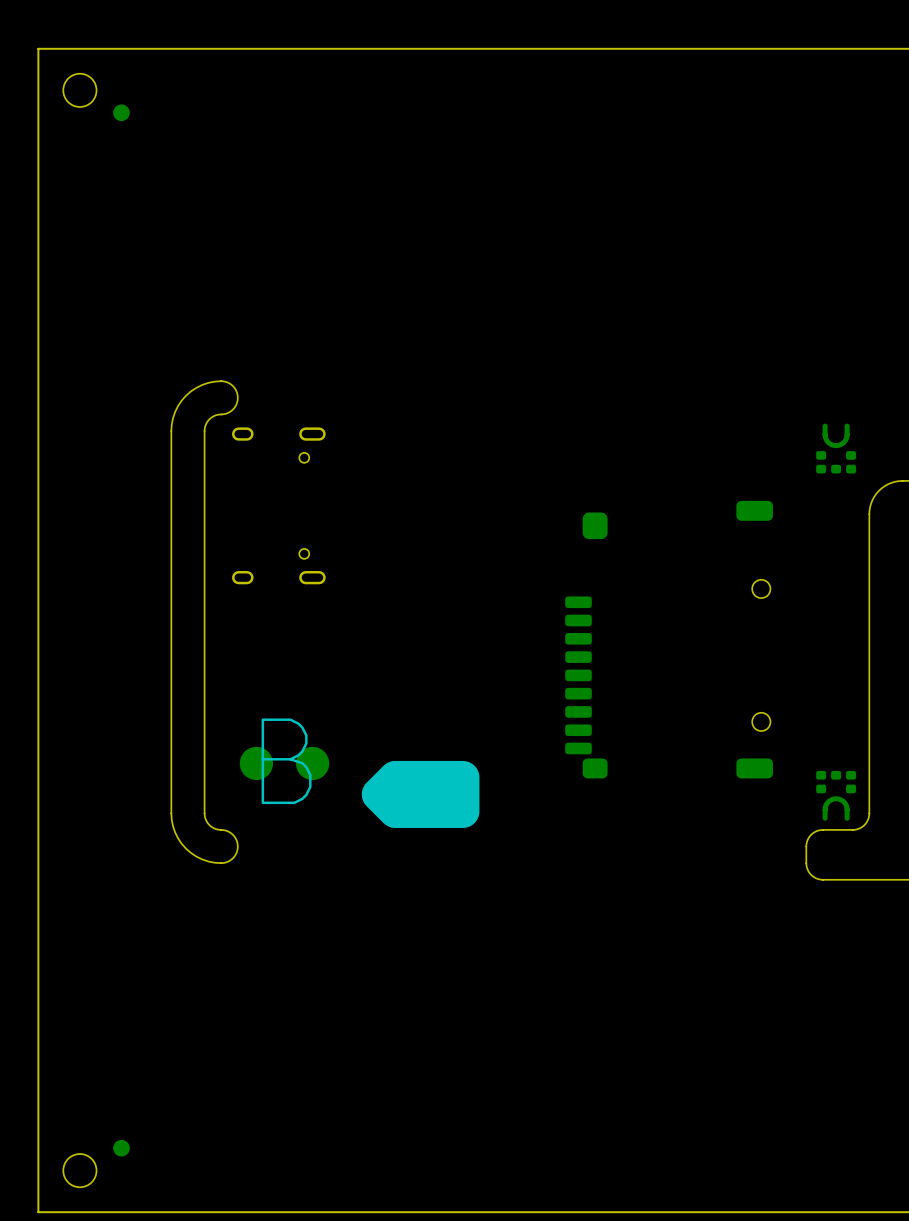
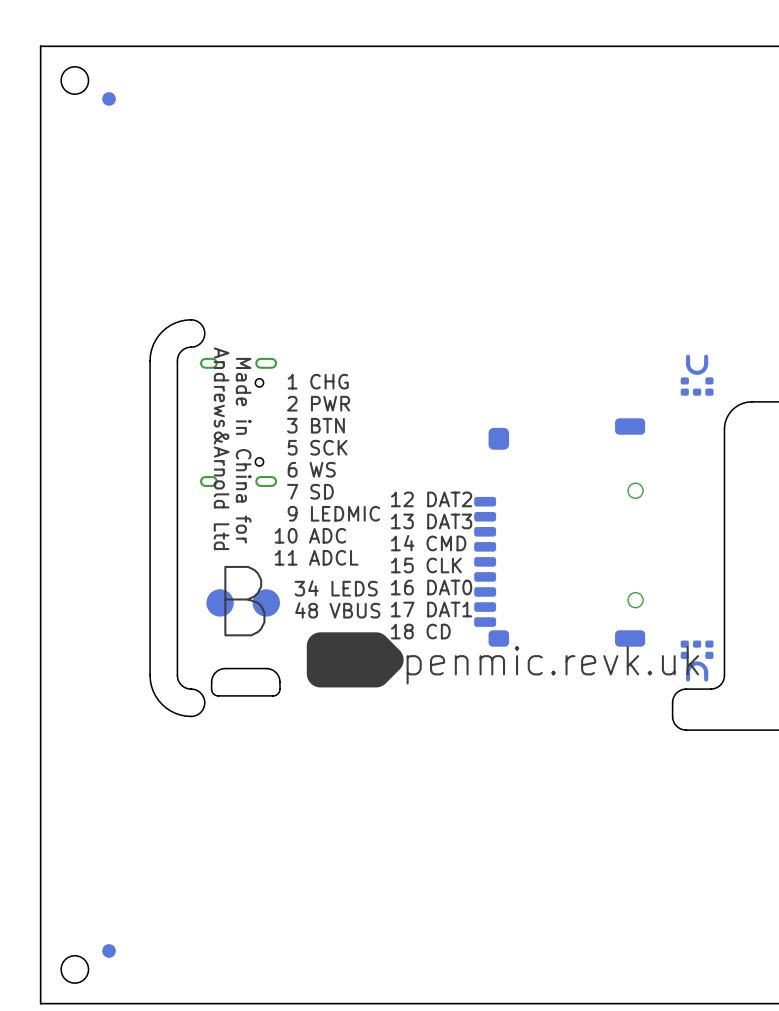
text: none -> 1 (292, 381)
text: none -> CHG (329, 381)
text: none -> 2 (292, 403)
text: none -> PWR (330, 403)
text: none -> 3 (292, 425)
text: none -> BTN (327, 425)
text: none -> 5 (292, 447)
text: none -> SCK (328, 447)
text: none -> Andrews&Arnold Ltd (221, 448)
text: none -> Made in China for (243, 450)
text: none -> 6 (292, 469)
text: none -> WS (322, 469)
text: none -> 7 (292, 491)
text: none -> SD (322, 491)
text: none -> 12 (402, 499)
text: none -> DAT2 (449, 499)
text: none -> 9 (292, 513)
text: none -> LEDMIC (345, 513)
text: none -> 13 (402, 521)
text: none -> DAT3 (449, 521)
text: none -> 10 (286, 535)
text: none -> ADC (327, 535)
text: none -> 14 (402, 543)
text: none -> CMD (446, 543)
text: none -> 11 (286, 557)
text: none -> ADCL (333, 557)
text: none -> 15 (402, 565)
text: none -> CLK (444, 565)
text: none -> 16 (402, 587)
text: none -> DAT0 (449, 587)
text: none -> 34 (306, 588)
text: none -> LEDS (354, 588)
text: none -> 17 (402, 609)
text: none -> DAT1 (449, 609)
text: none -> 48 (306, 610)
text: none -> VBUS (354, 610)
text: none -> 18 (402, 631)
text: none -> CD (438, 631)
part position: (284, 763) -> (243, 602)
part rotation: 0° (420, 794) -> 180° (355, 659)
text: none -> openmic.revk.uk (539, 665)
board edge: none -> (266, 668) (219, 669) (212, 677) (212, 691) (218, 695) (275, 695) (279, 689) (279, 677) (273, 670) (266, 668)

